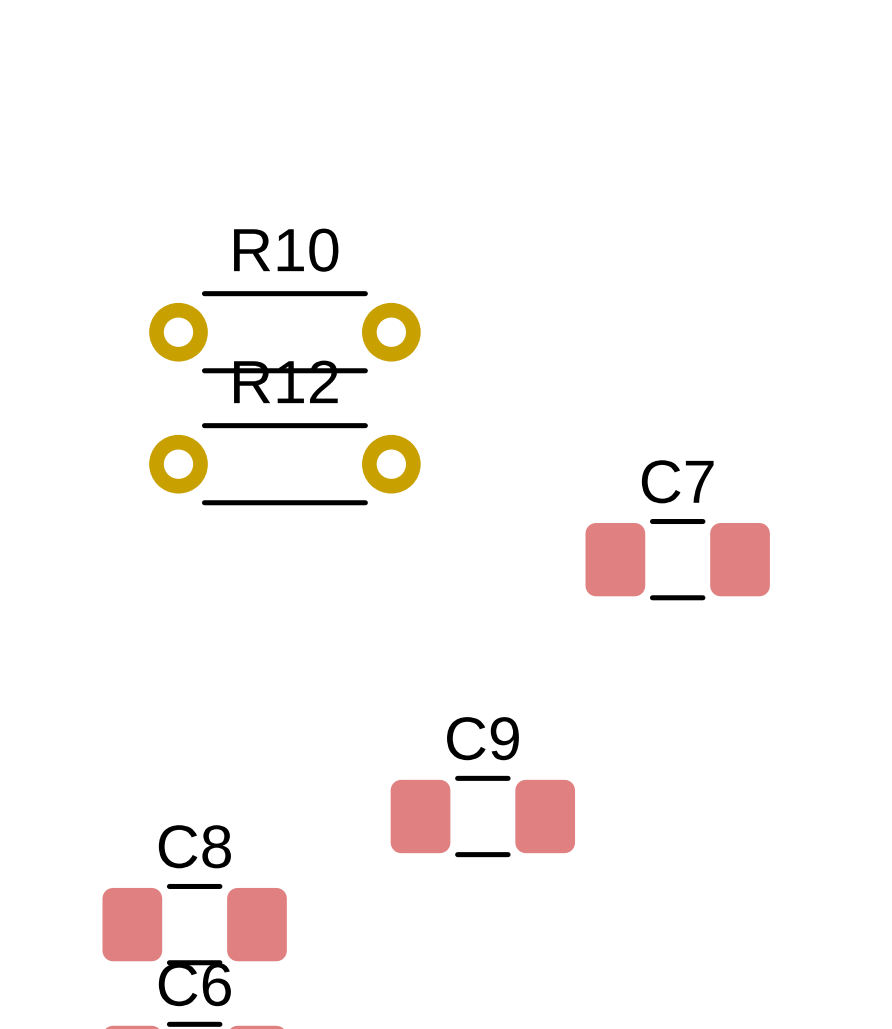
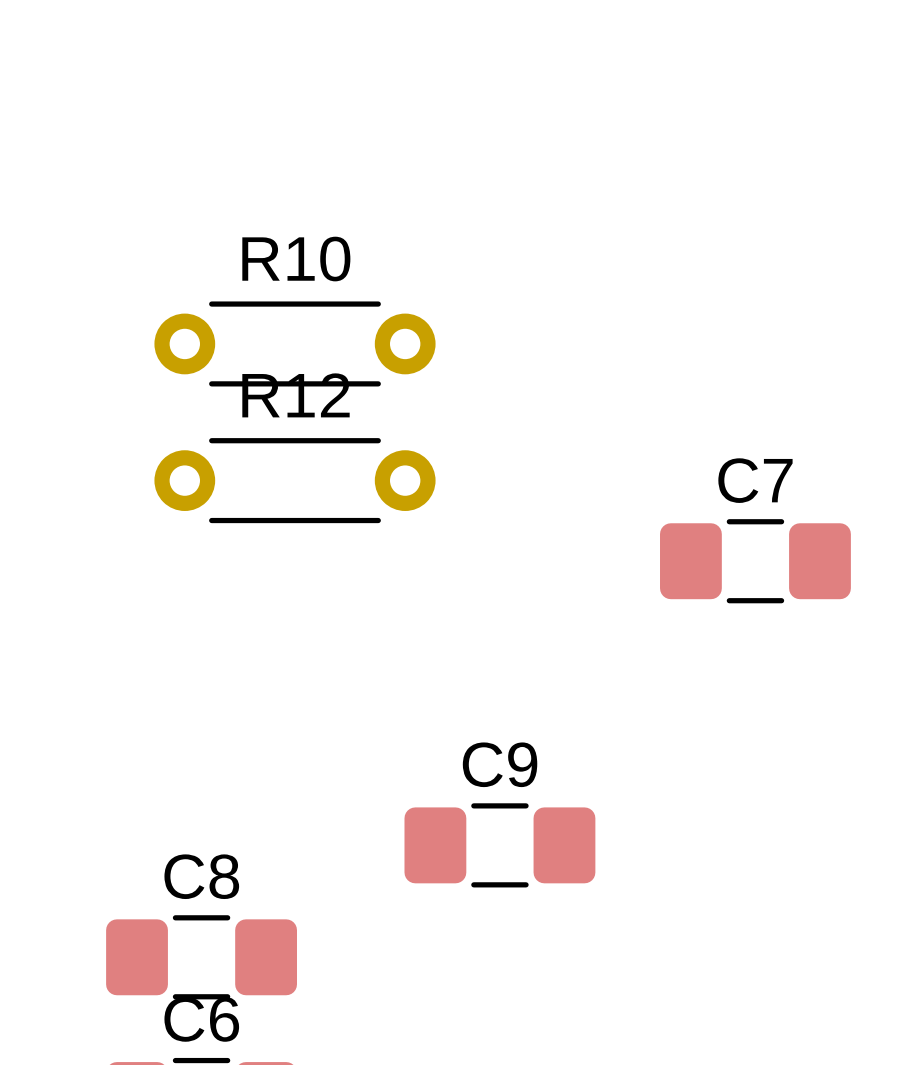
C7 position: (677, 559) -> (755, 561)

